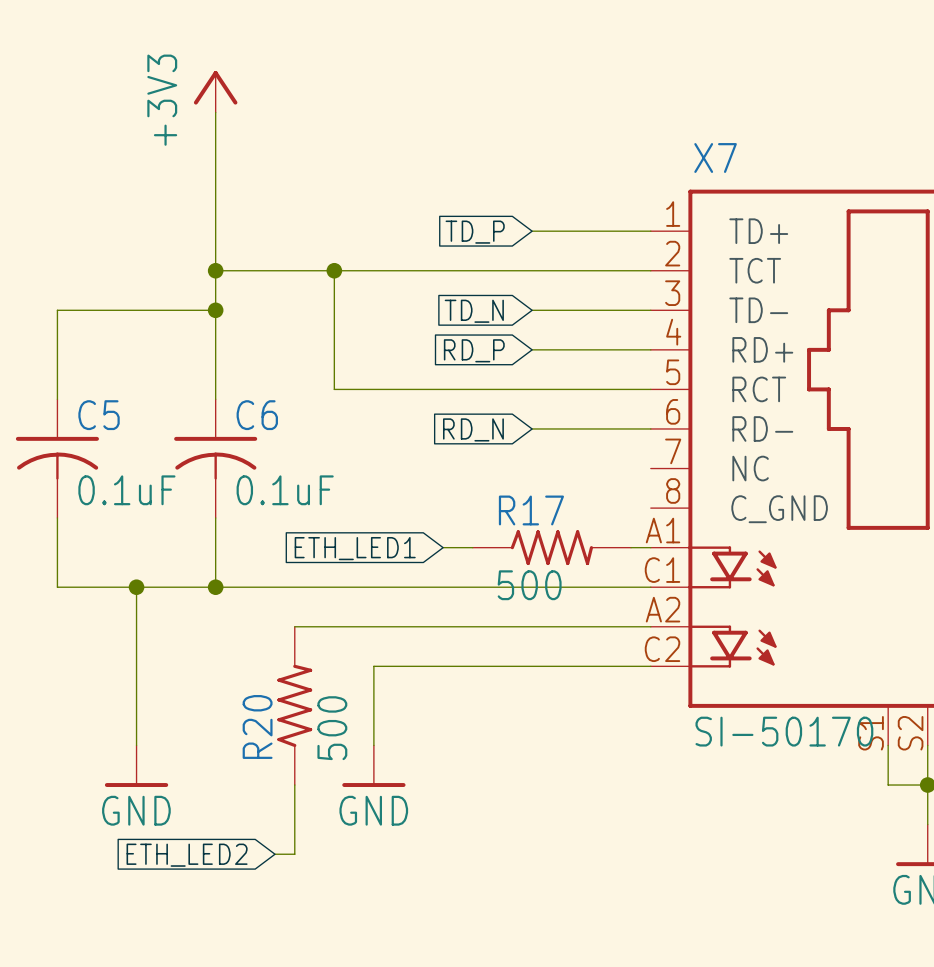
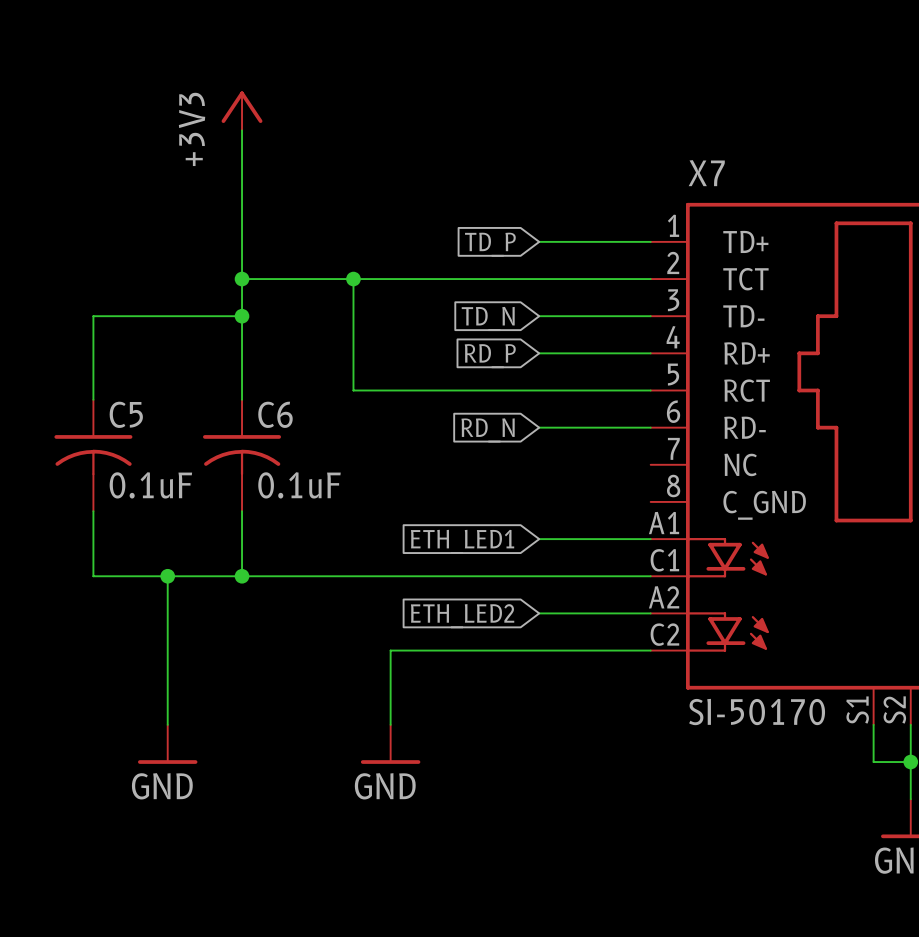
wire: (443, 547) (472, 547) -> none
R17: 500 (551, 547) -> none
global label position: ETH_LED1 (355, 548) -> ETH_LED1 (462, 541)
wire: (294, 626) (532, 626) -> none
R20: 500 (294, 705) -> none
wire: (294, 785) (294, 854) (275, 854) -> none
global label position: ETH_LED2 (187, 855) -> ETH_LED2 (462, 616)

